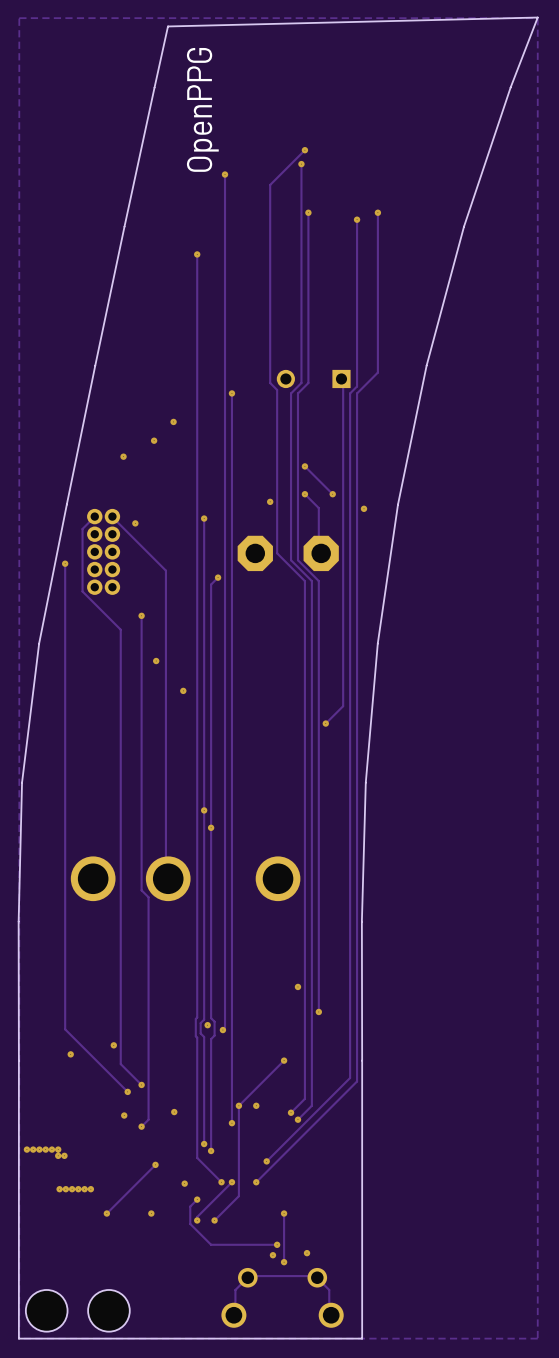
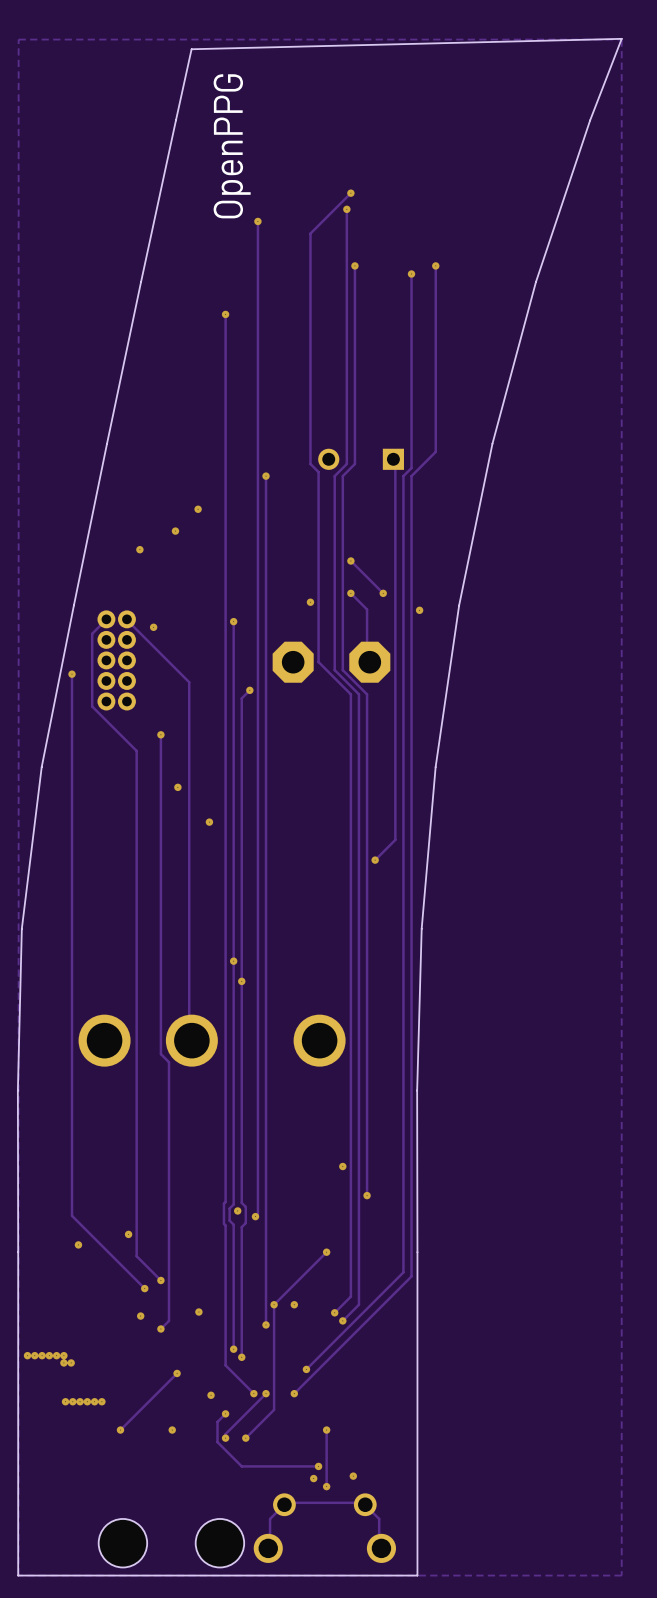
hole position: (46, 1310) -> (219, 1543)

